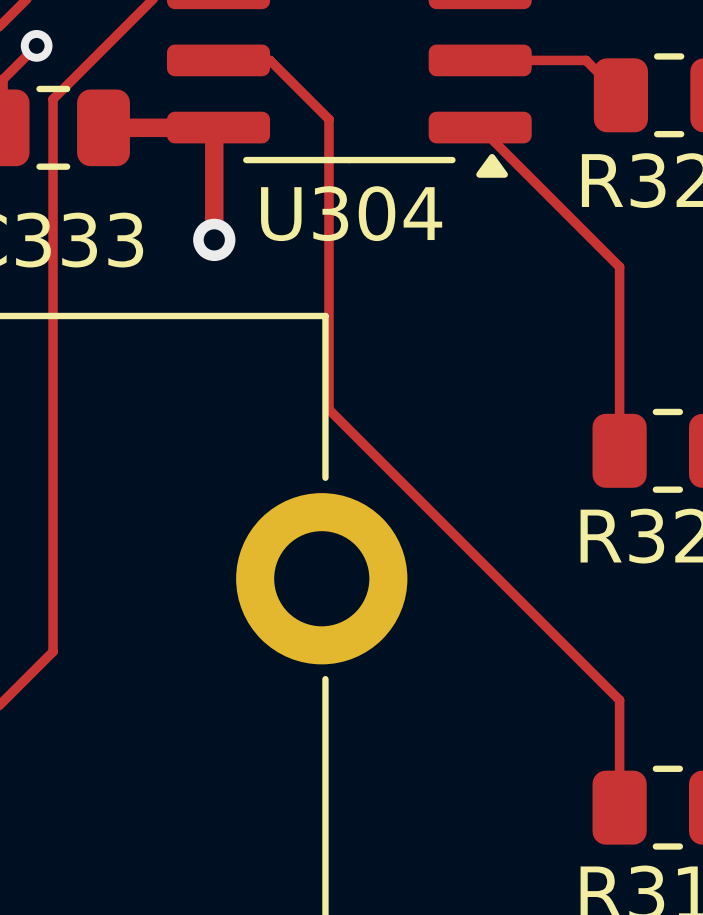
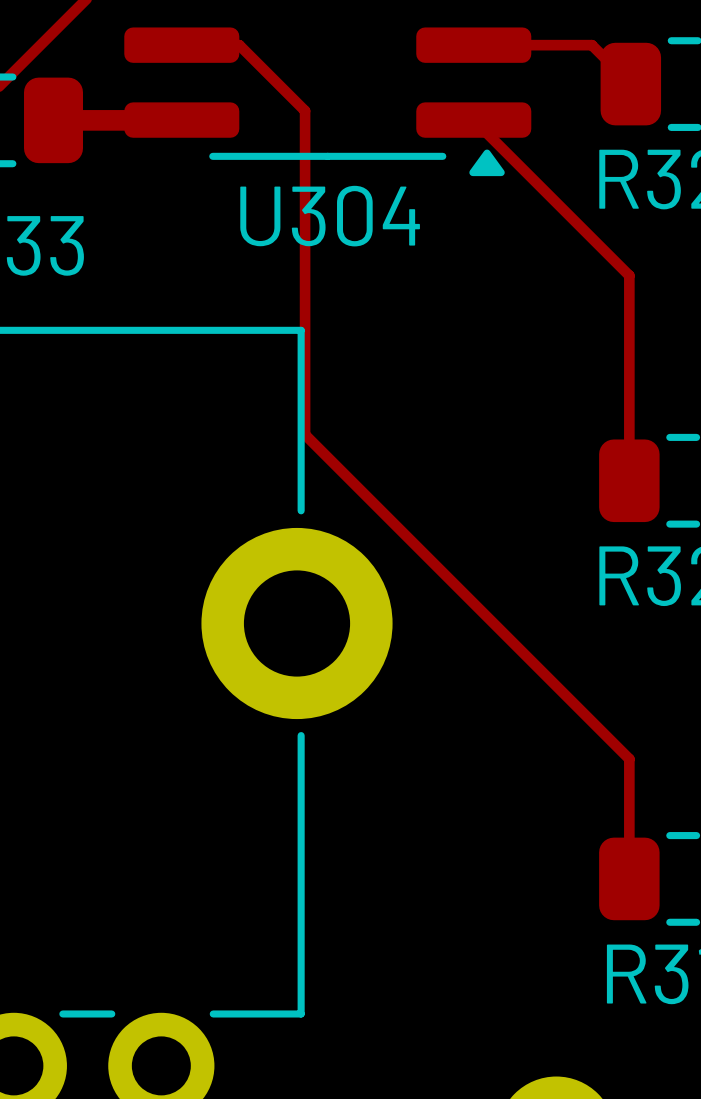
track: (218, 127) (214, 131) (214, 239) -> none
via: (214, 239) -> none

